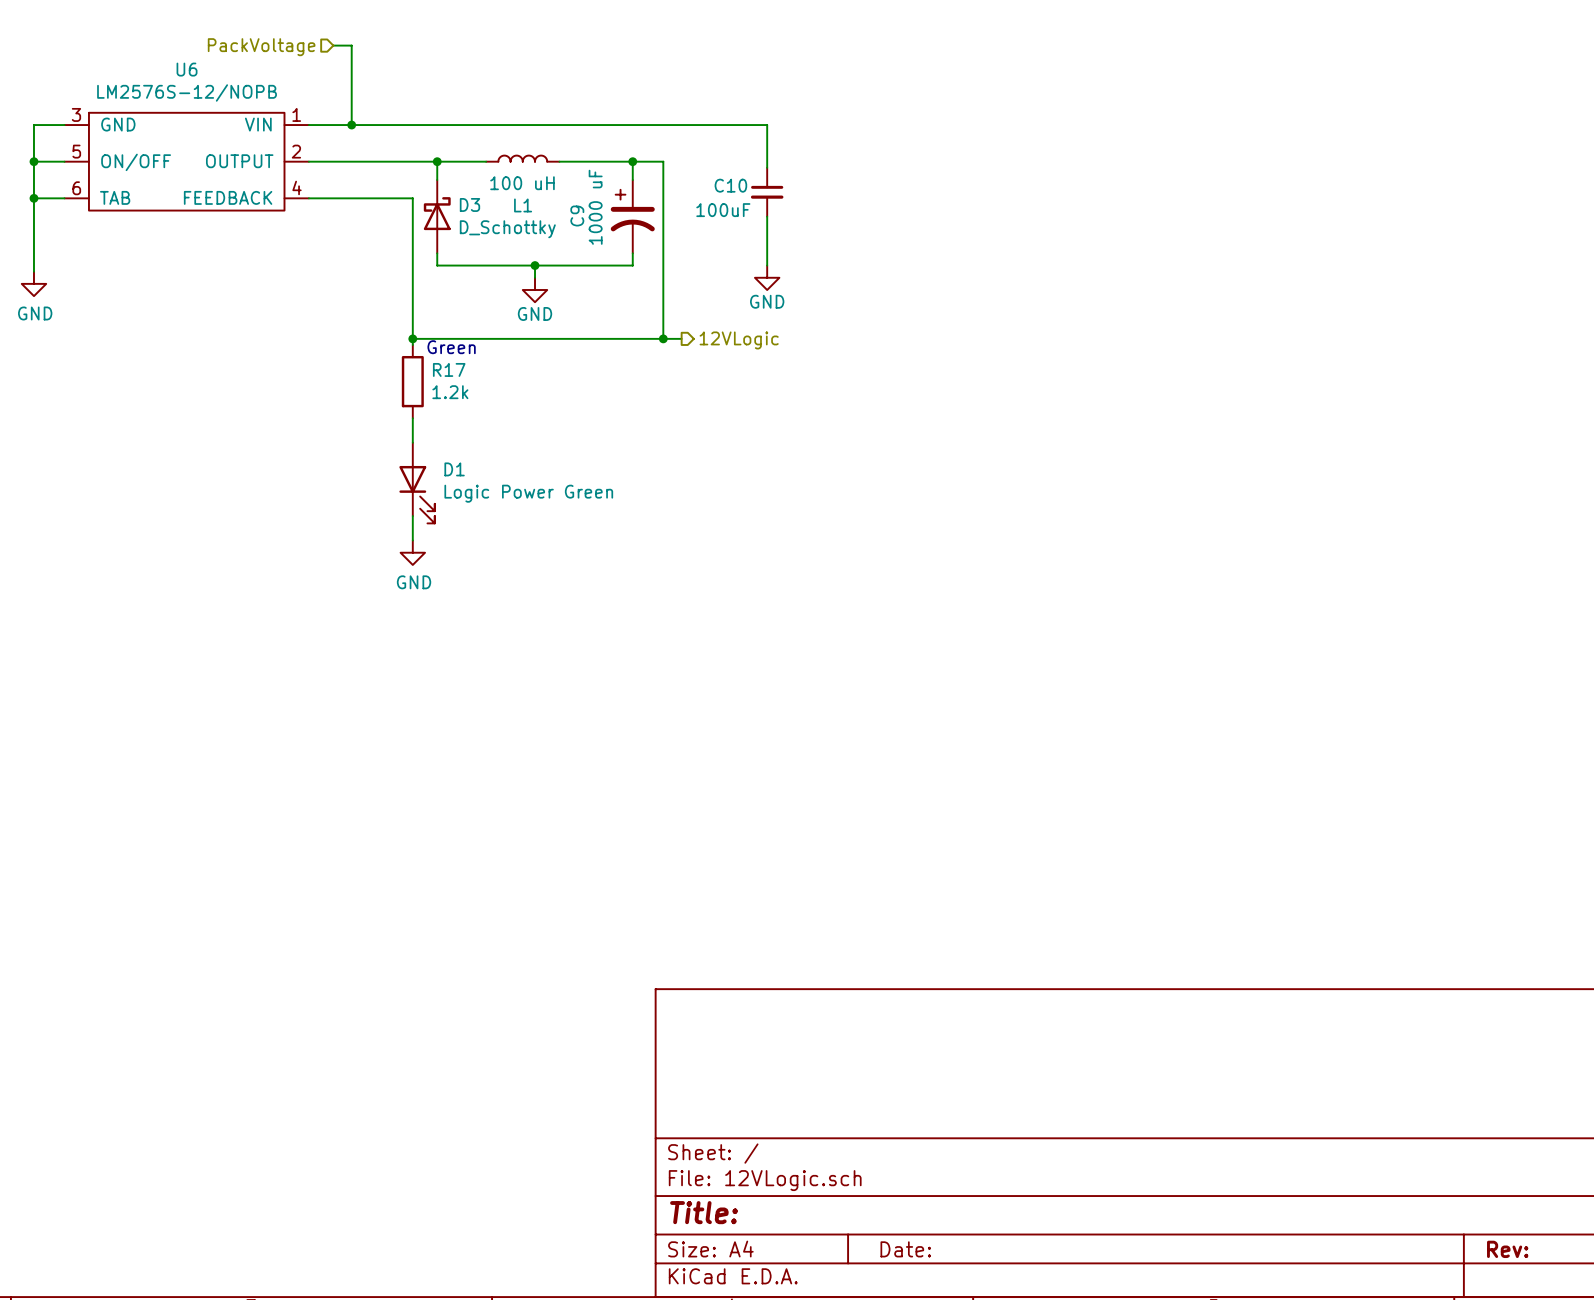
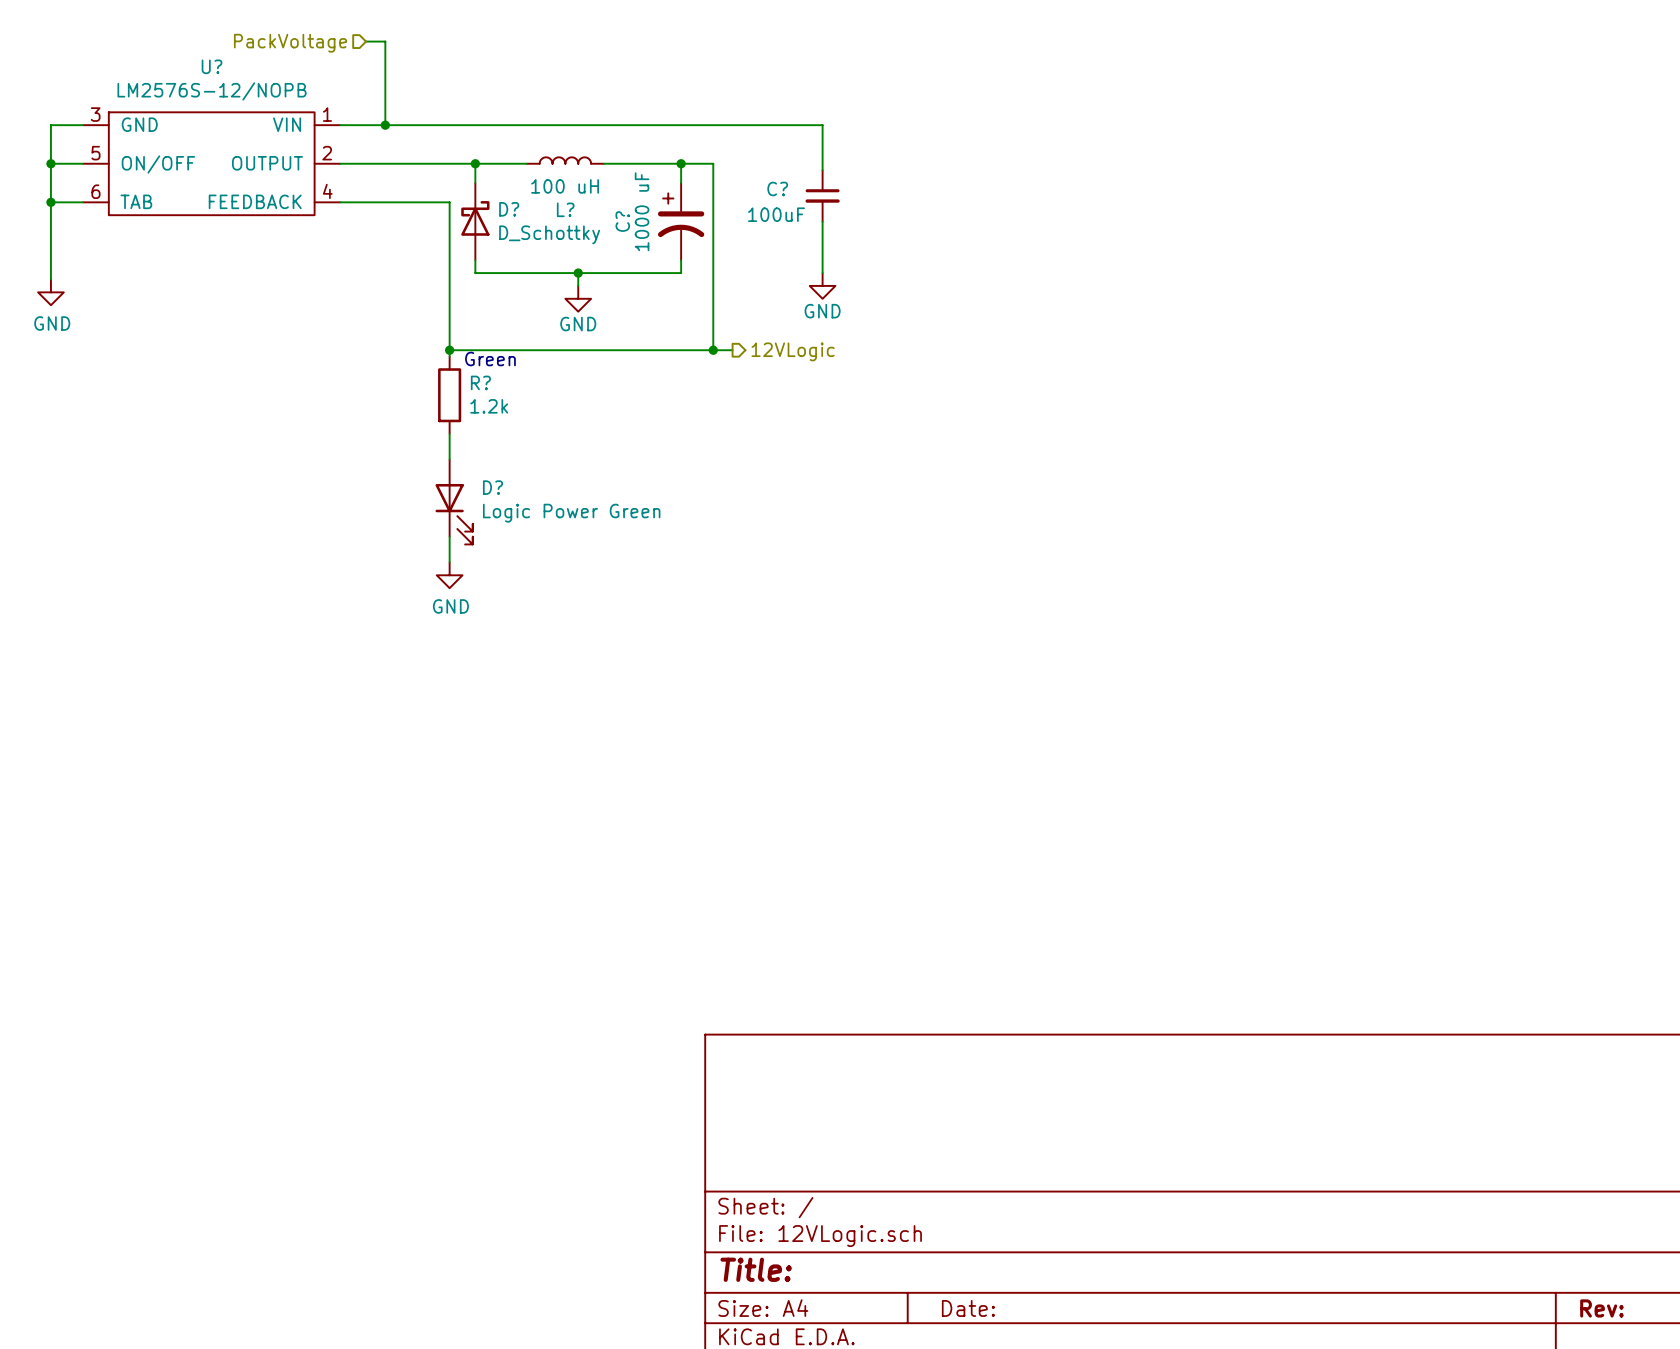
U6 name: U6 (187, 69) -> U? (212, 66)
C10 name: C10 (730, 185) -> C? (777, 188)
D3 name: D3 (469, 204) -> D? (509, 209)
L1 name: L1 (523, 205) -> L? (565, 209)
C9 name: C9 (577, 216) -> C? (622, 221)
R17 name: R17 (449, 369) -> R? (480, 382)
D1 name: D1 (454, 469) -> D? (492, 487)

